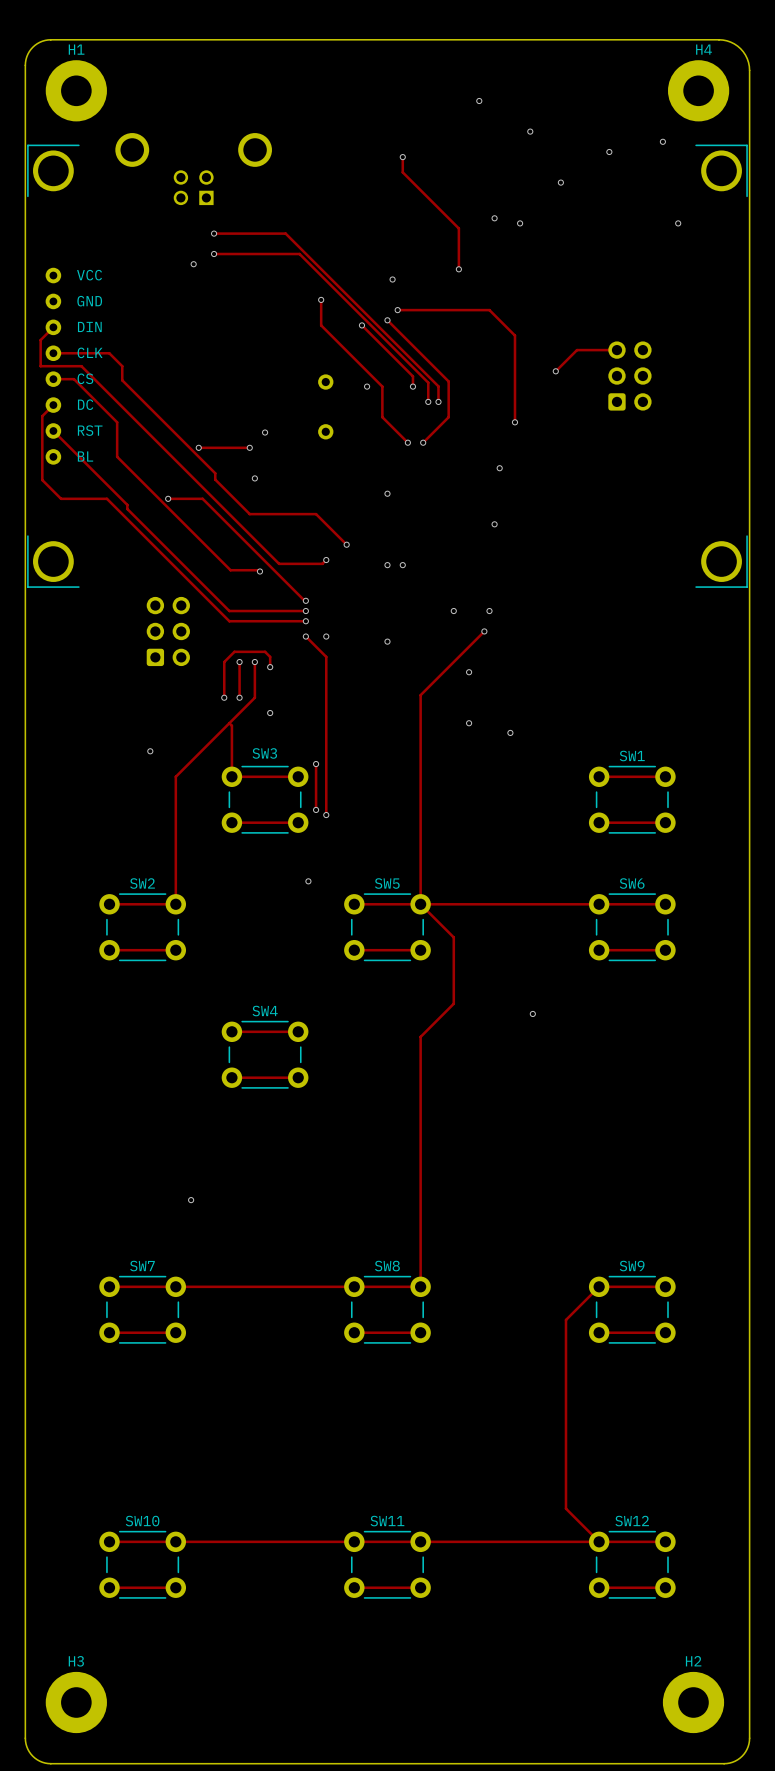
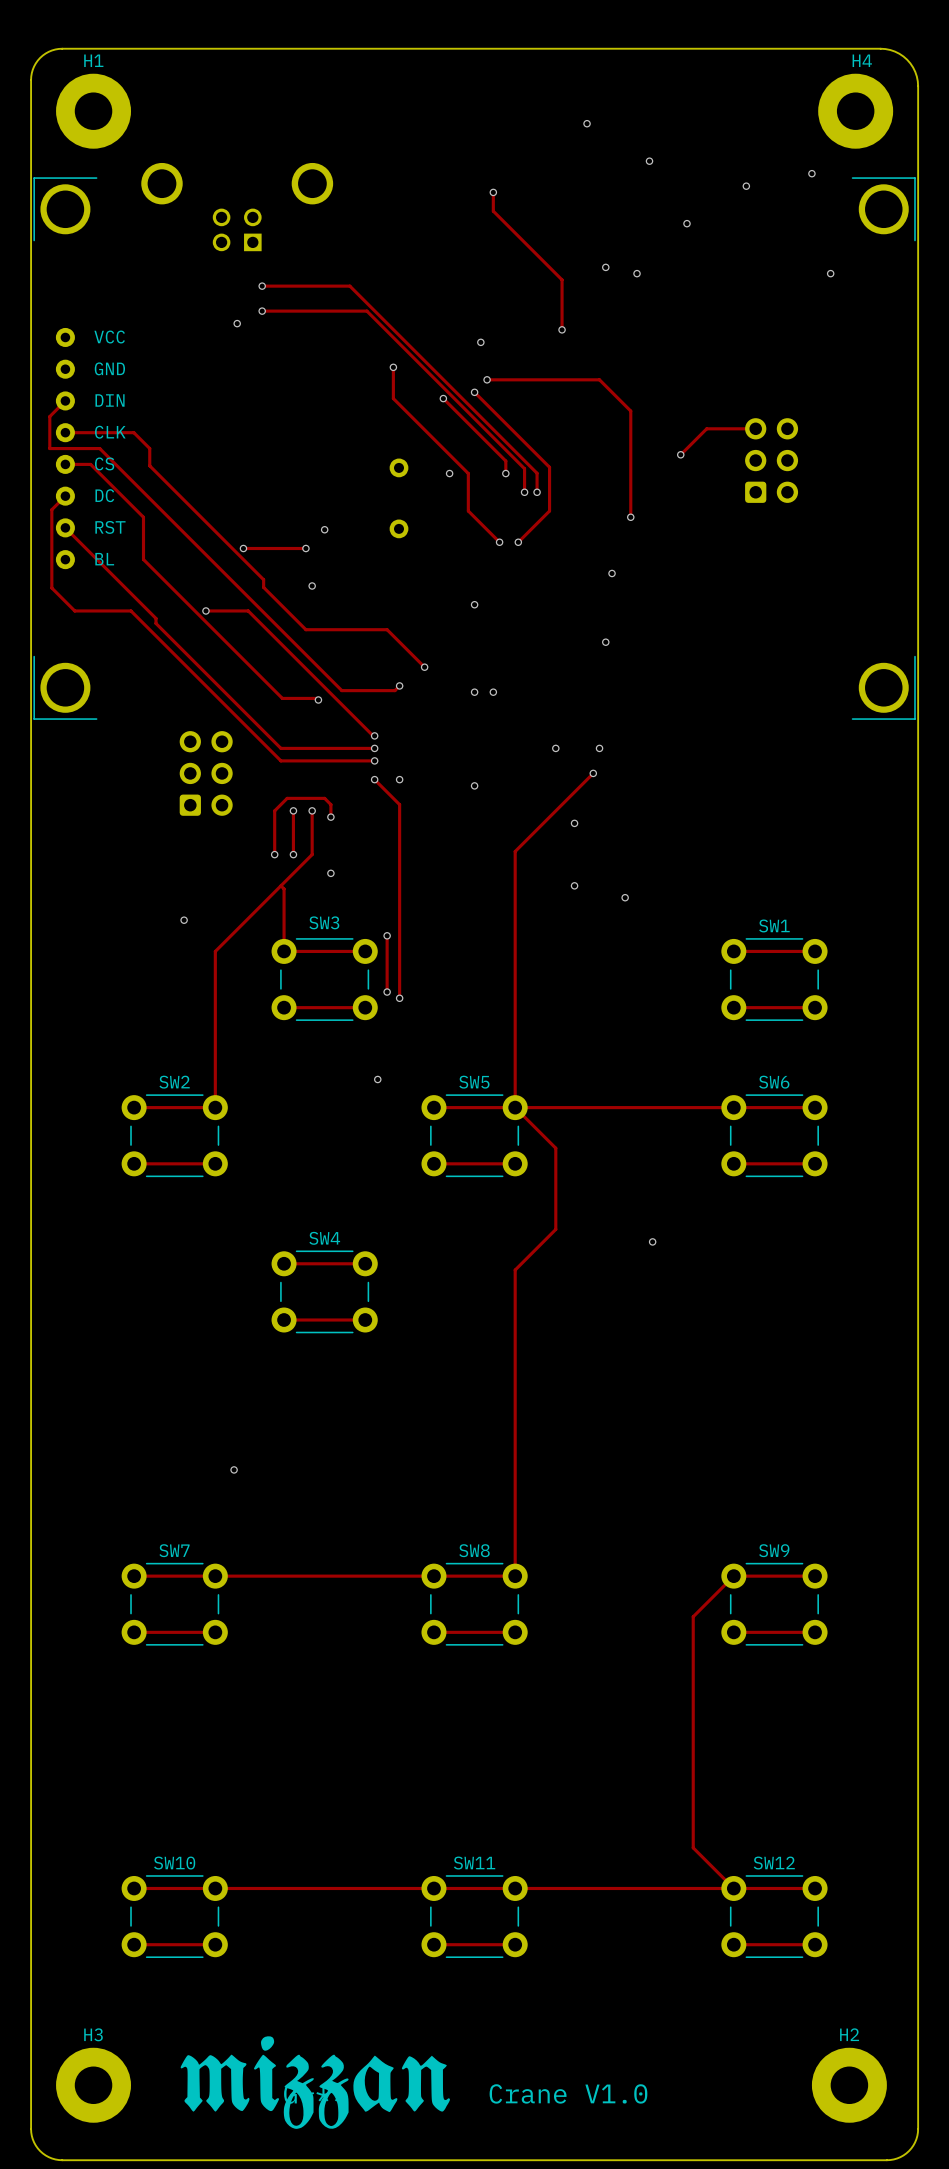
part: none -> (315, 2082)
text: none -> Crane V1.0 (568, 2093)

